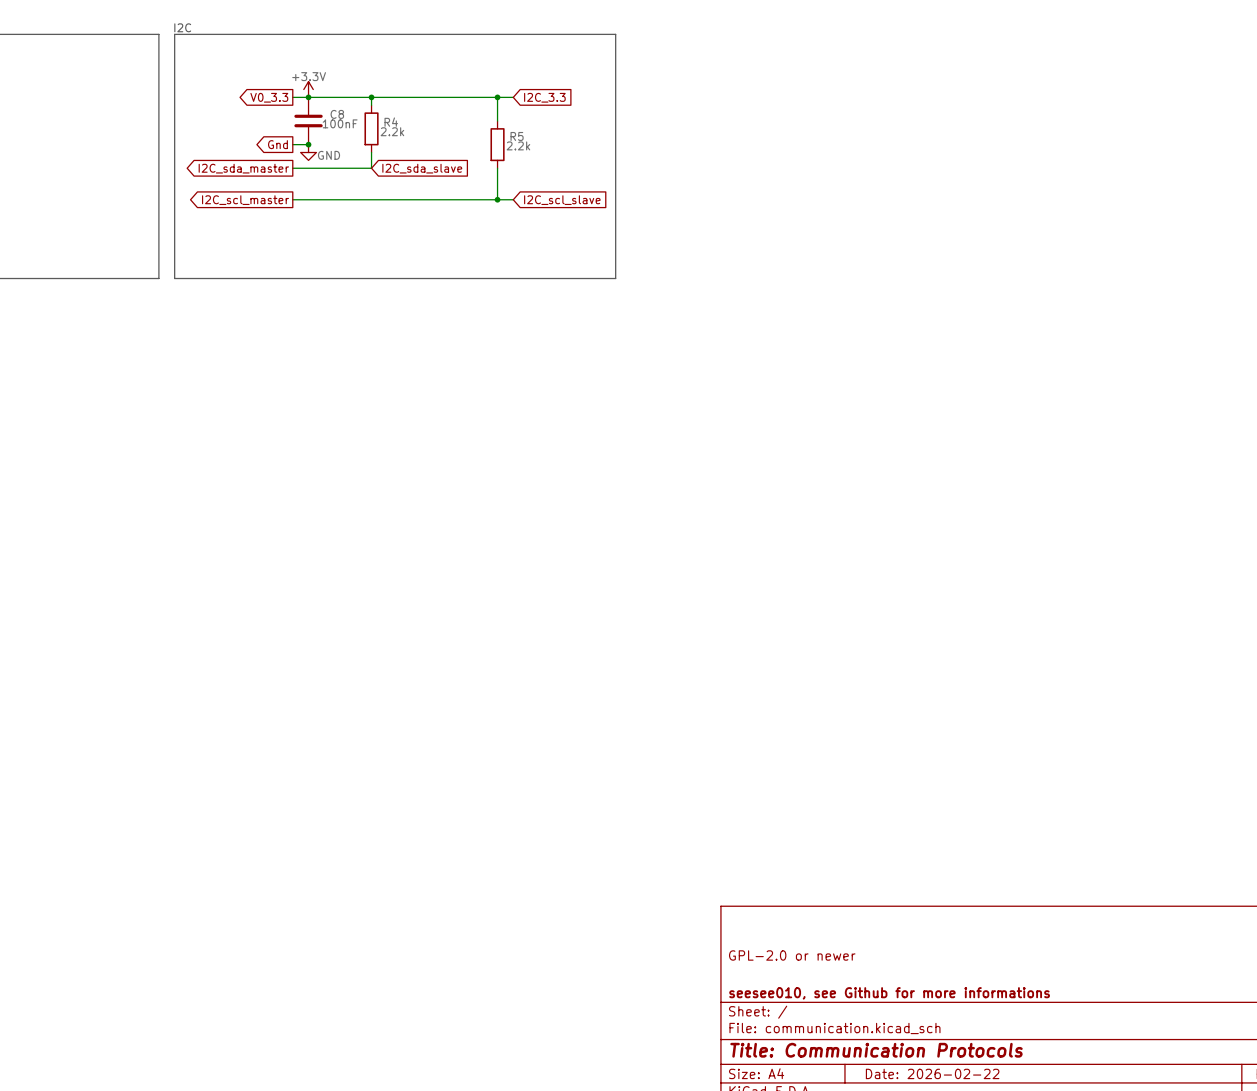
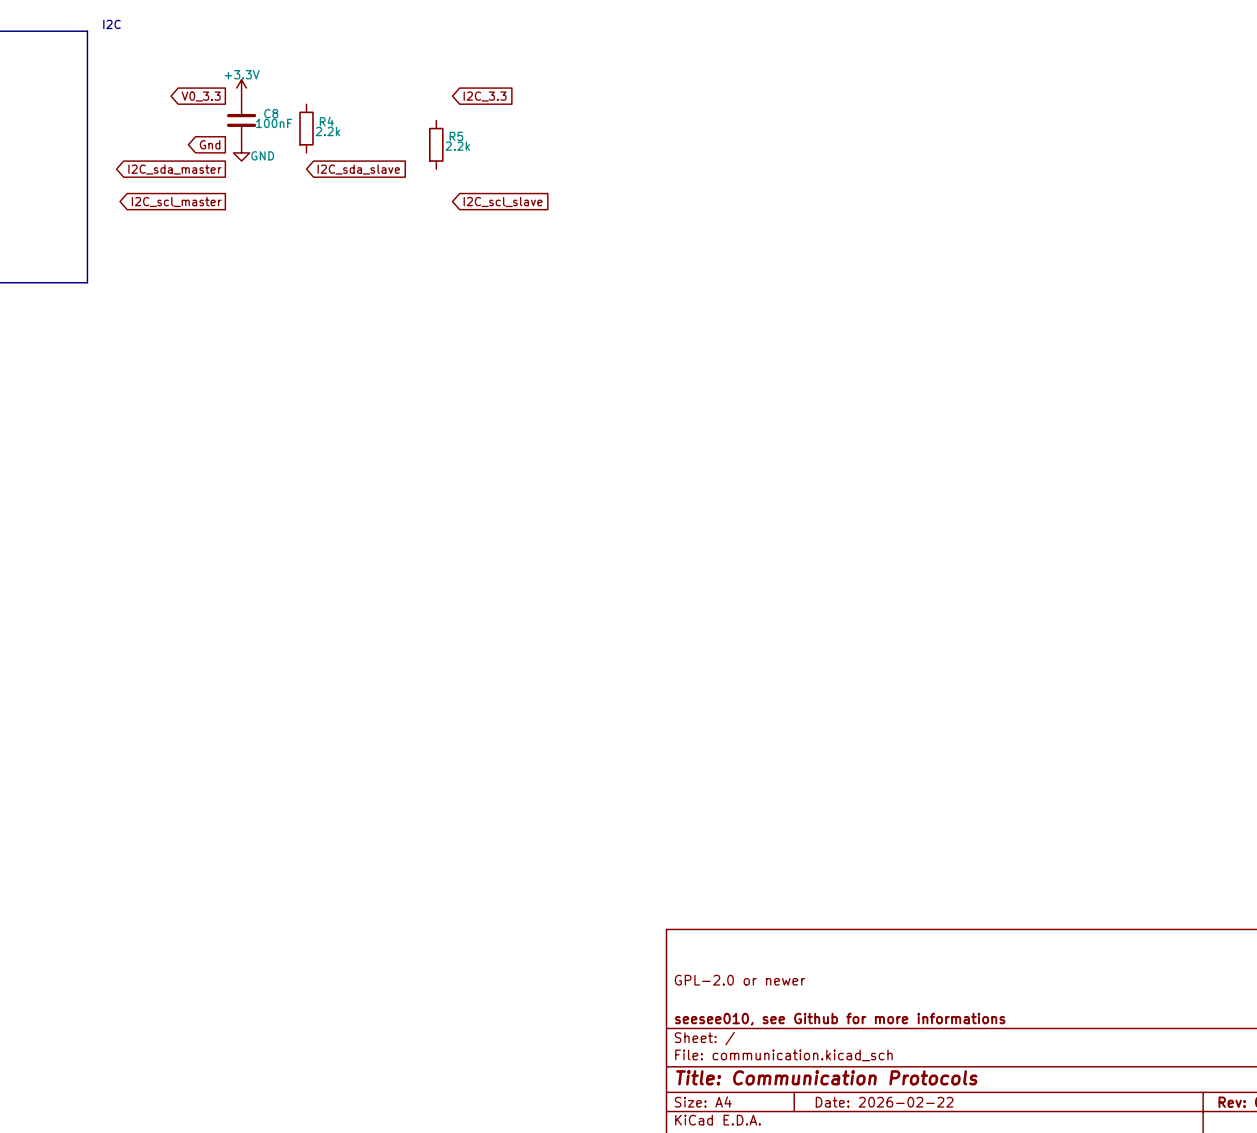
line: (174, 34) (615, 34) (615, 278) (174, 278) (174, 34) -> none
wire: (292, 97) (513, 97) -> none
junction: (308, 97) -> none
wire: (371, 97) (371, 105) -> none
junction: (371, 97) -> none
wire: (497, 97) (497, 121) -> none
junction: (497, 97) -> none
wire: (292, 144) (308, 144) -> none
junction: (308, 144) -> none
wire: (371, 152) (371, 168) (292, 168) -> none
wire: (497, 168) (497, 199) -> none
wire: (292, 199) (513, 199) -> none
junction: (497, 199) -> none

